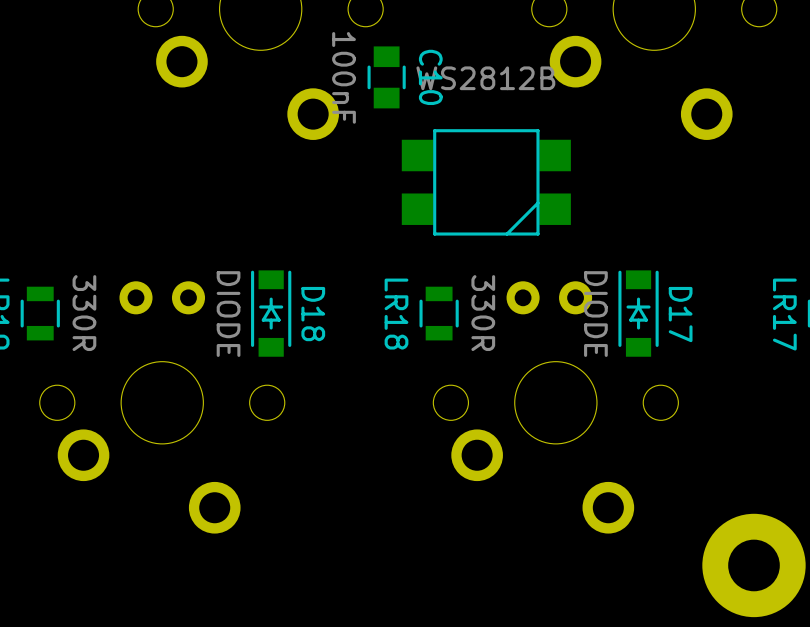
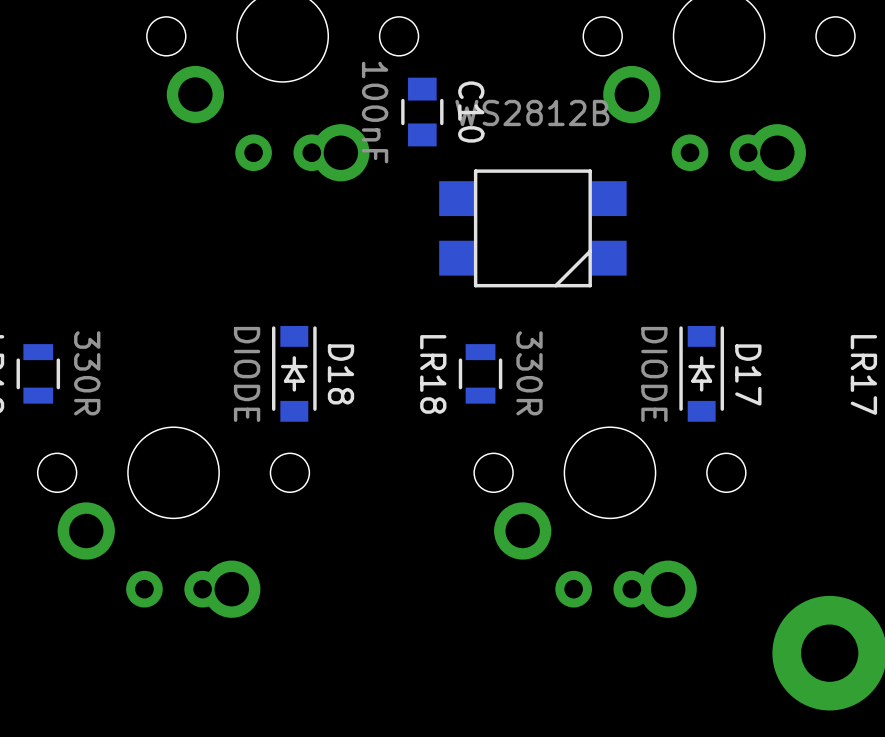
part: none -> (282, 152)
part: none -> (719, 152)
part: (162, 297) -> none
part: (549, 297) -> none
part: none -> (173, 589)
part: none -> (602, 589)

